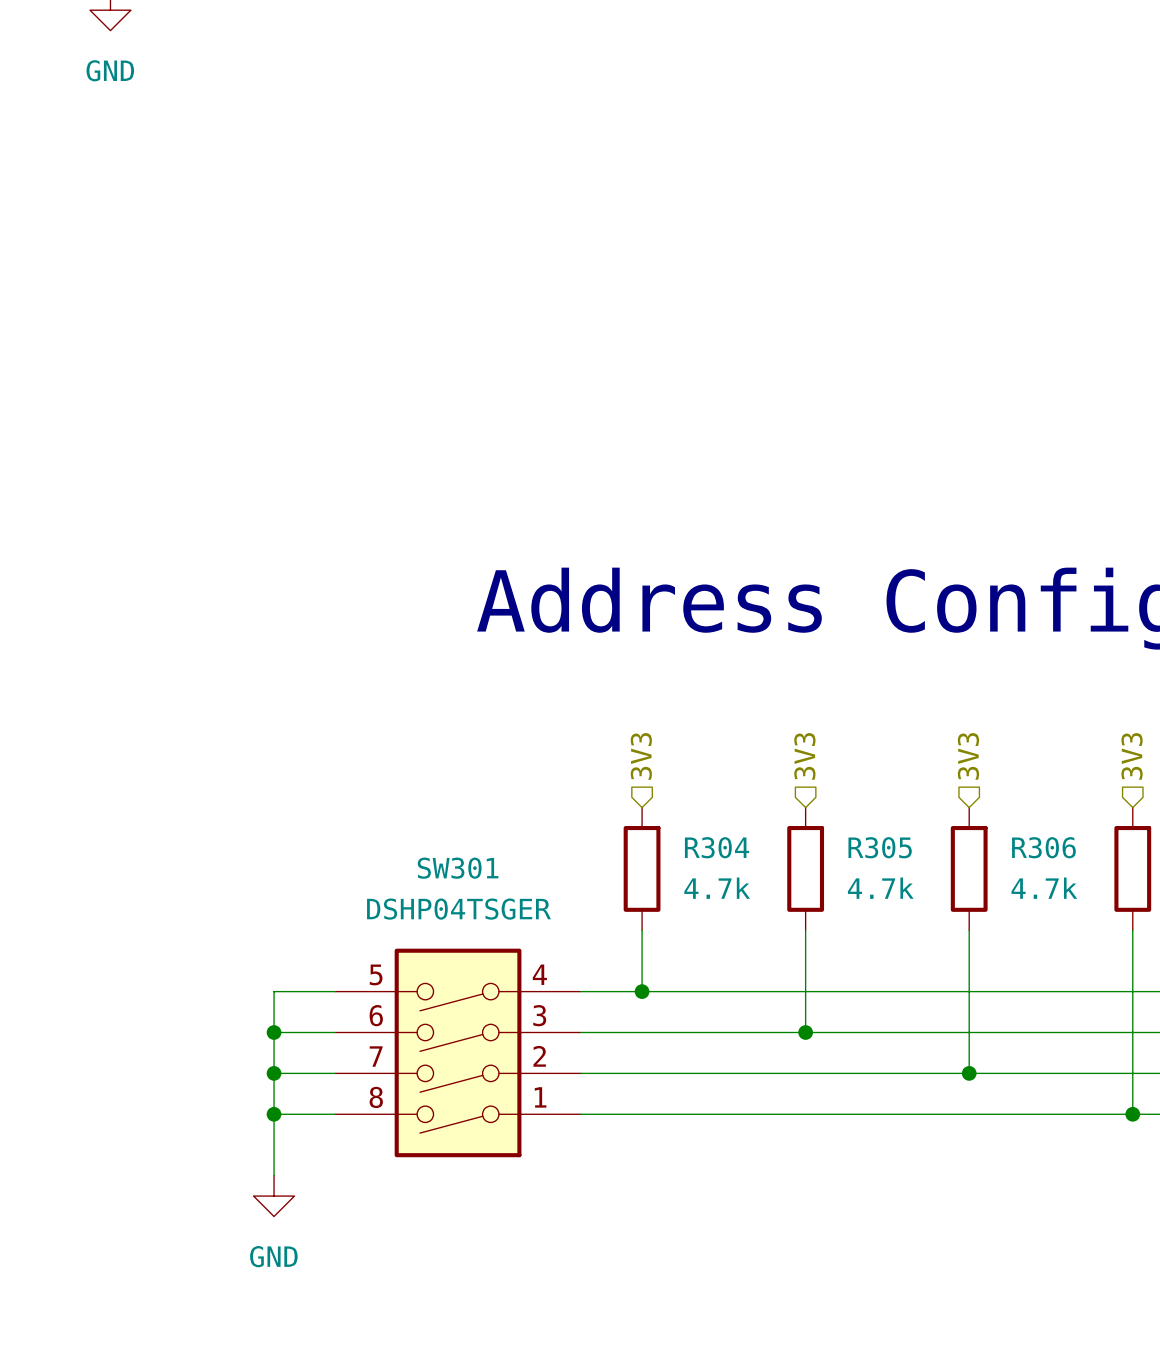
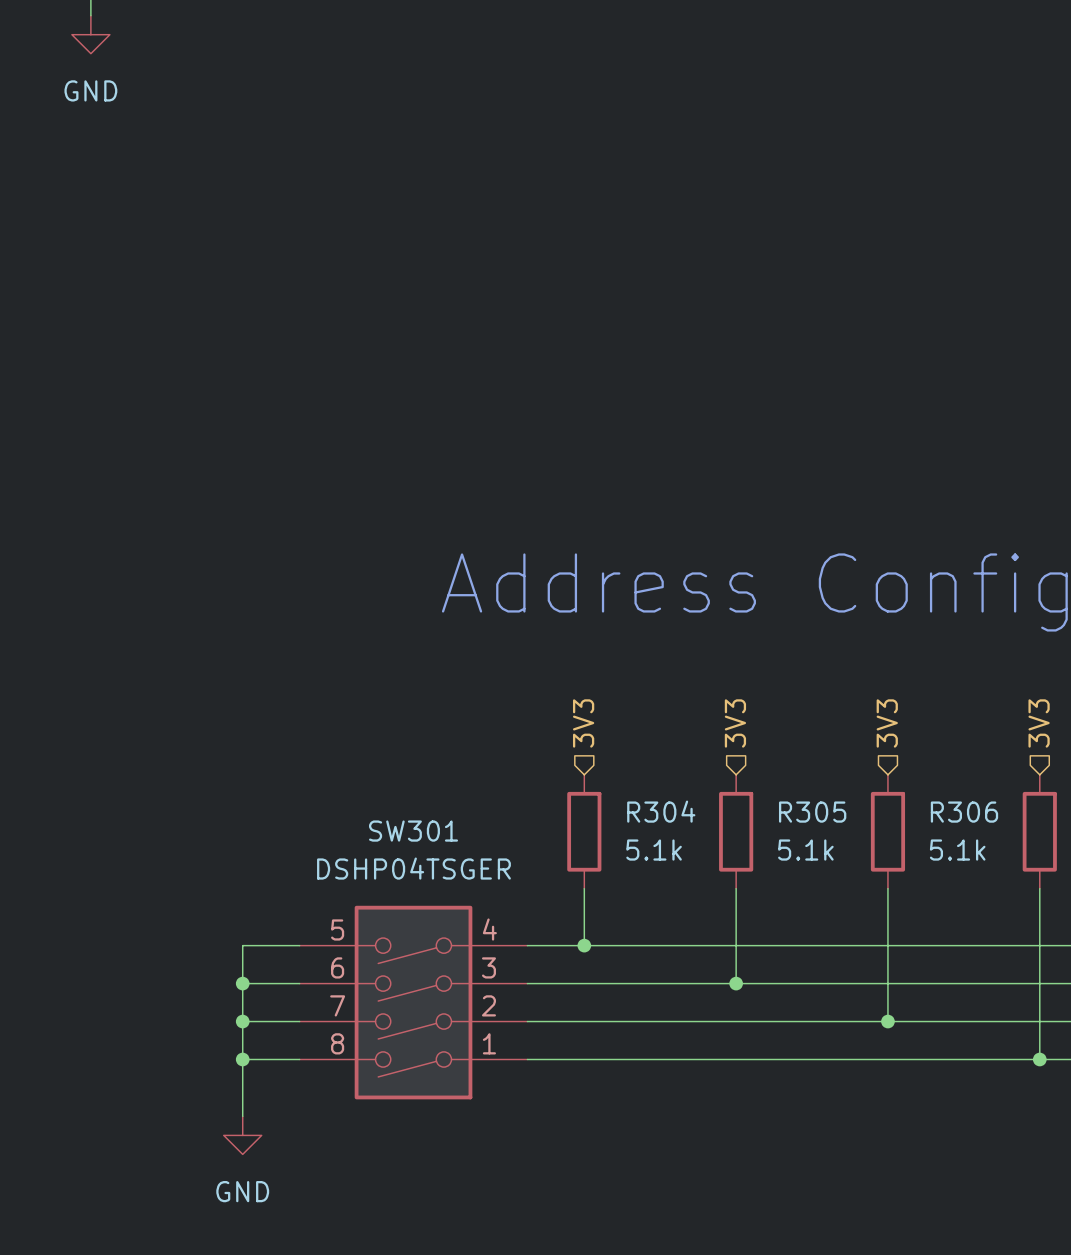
R304 value: 4.7k (717, 888) -> 5.1k (654, 850)
R305 value: 4.7k (880, 888) -> 5.1k (805, 850)
R306 value: 4.7k (1044, 888) -> 5.1k (957, 850)

